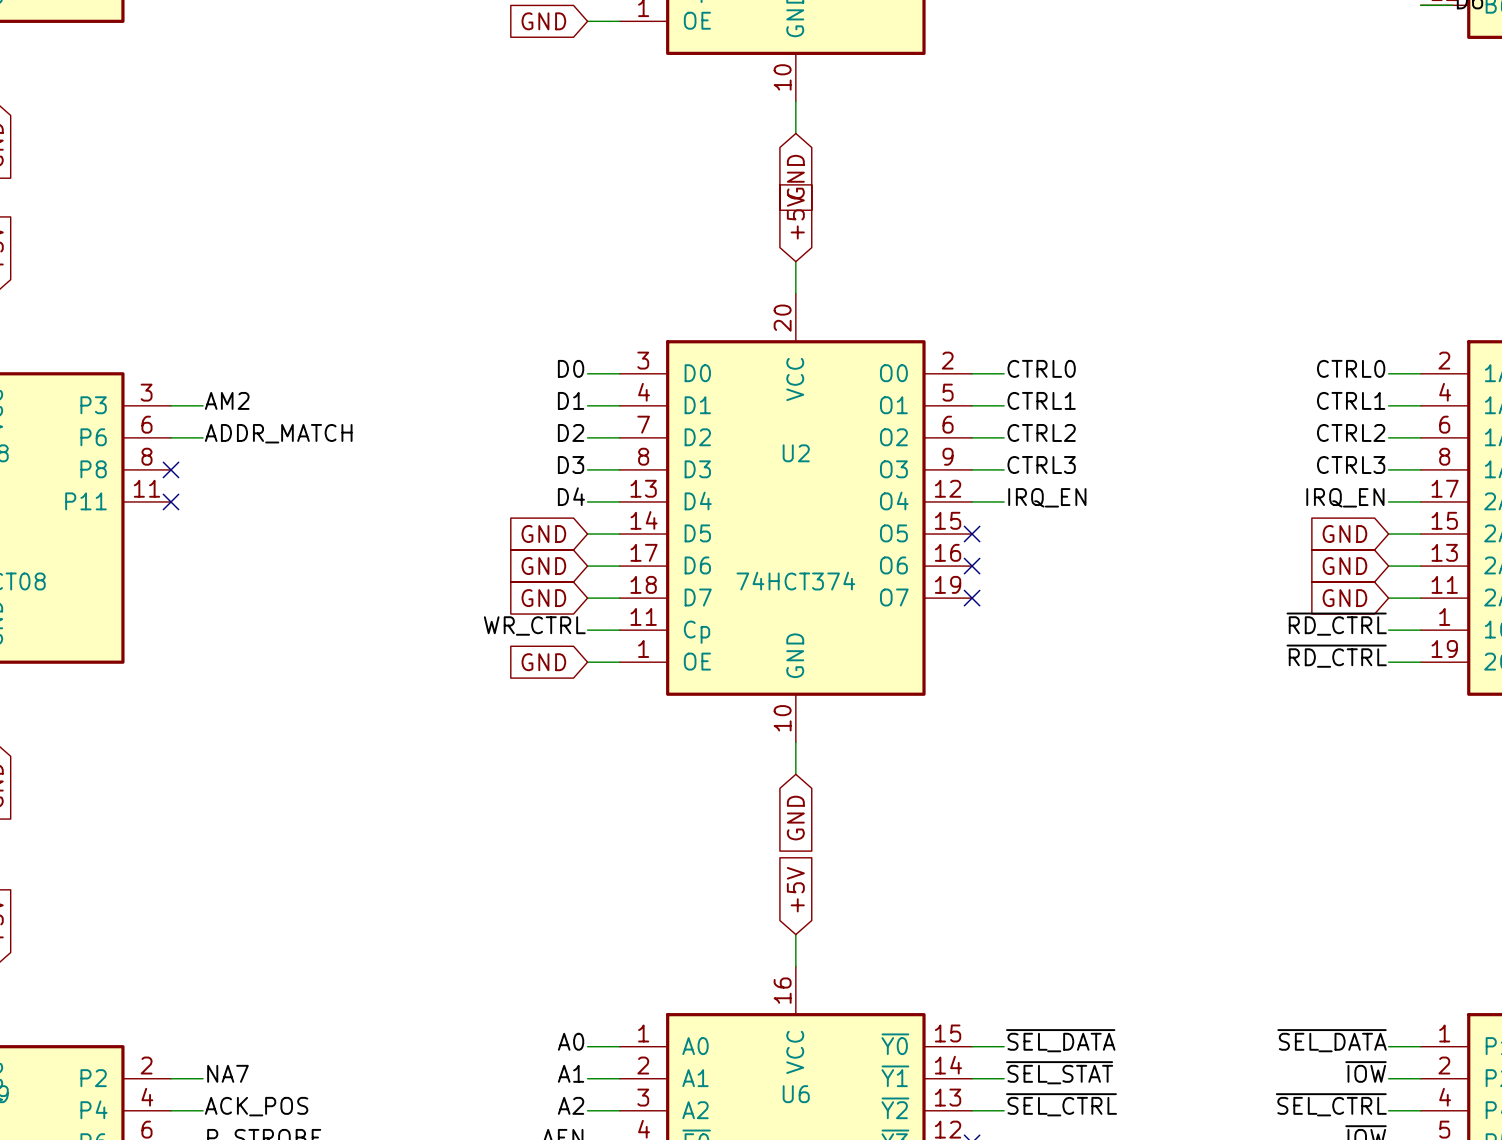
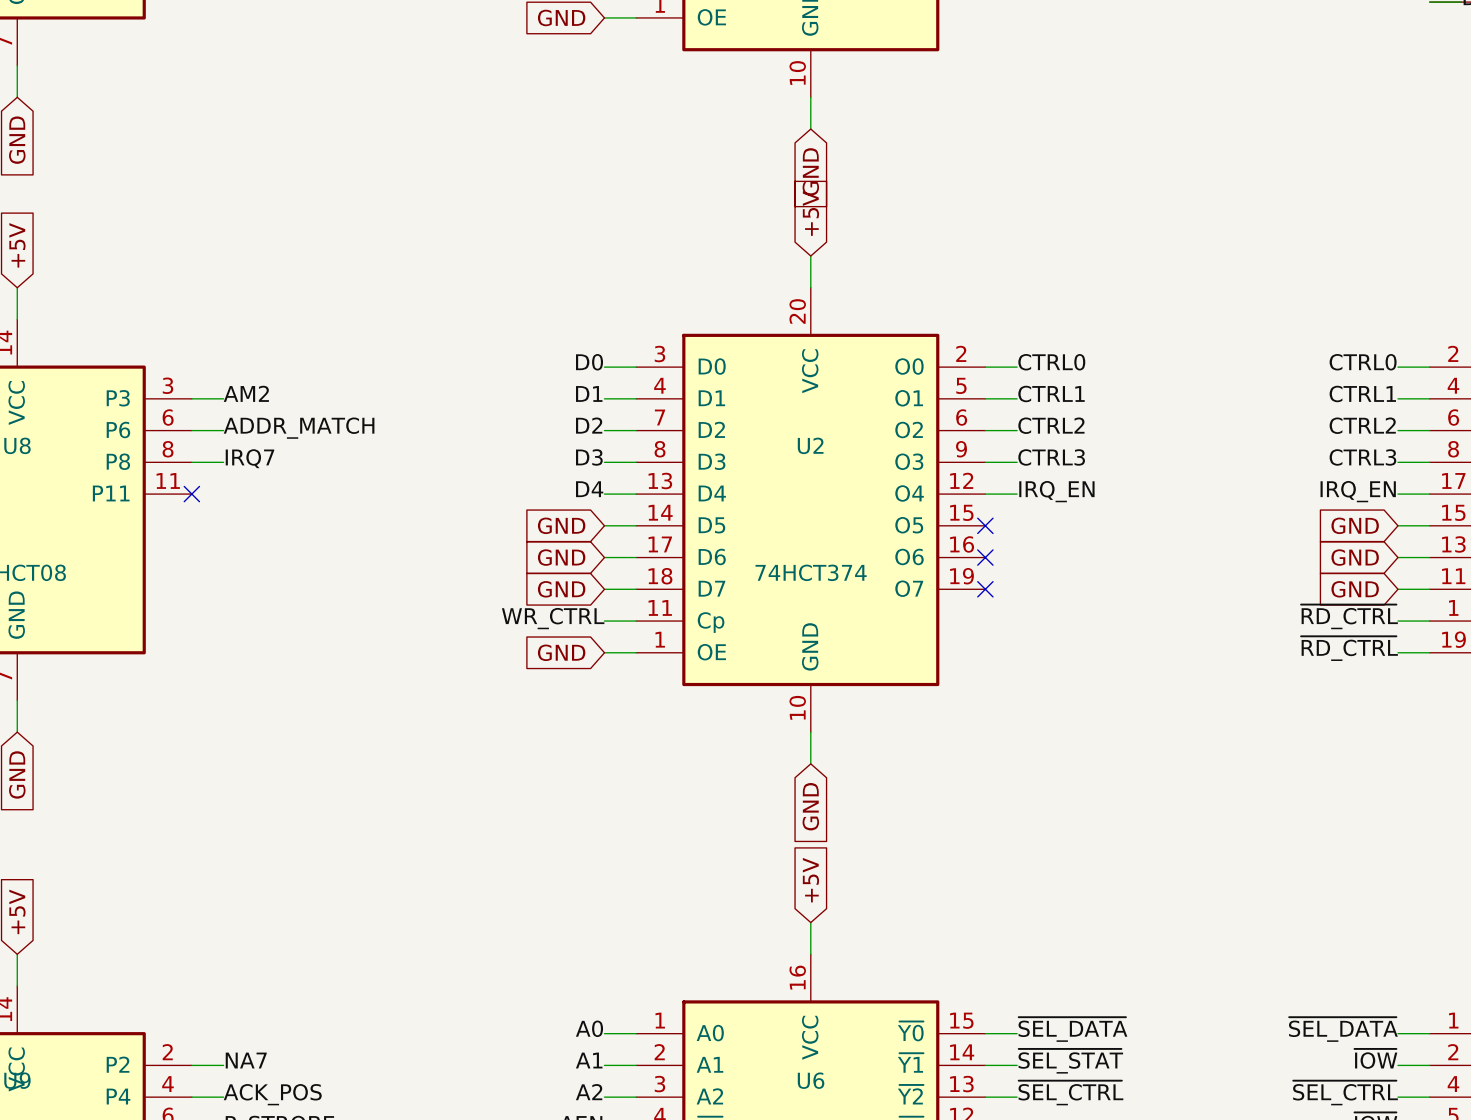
label: none -> IRQ7 (249, 458)
wire: none -> (191, 462) (223, 462)
no-connect mark: (171, 469) -> none

